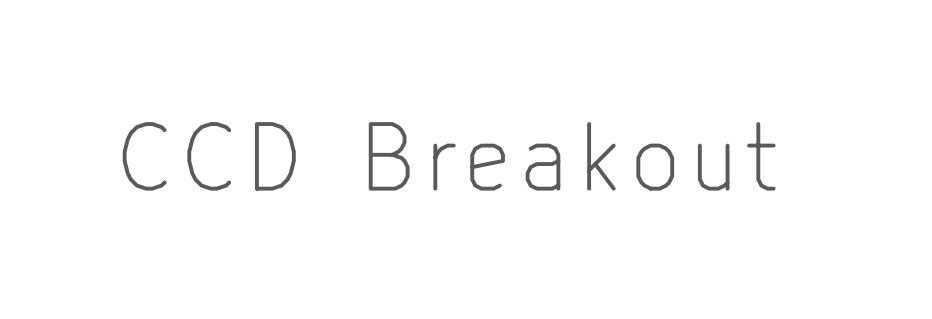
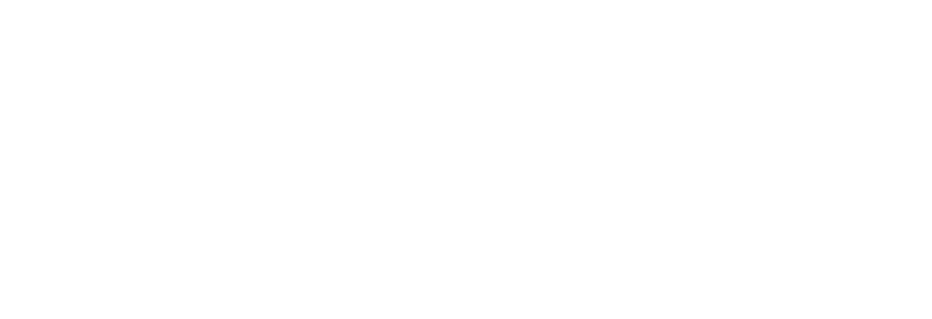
text: CCD Breakout (449, 156) -> none

